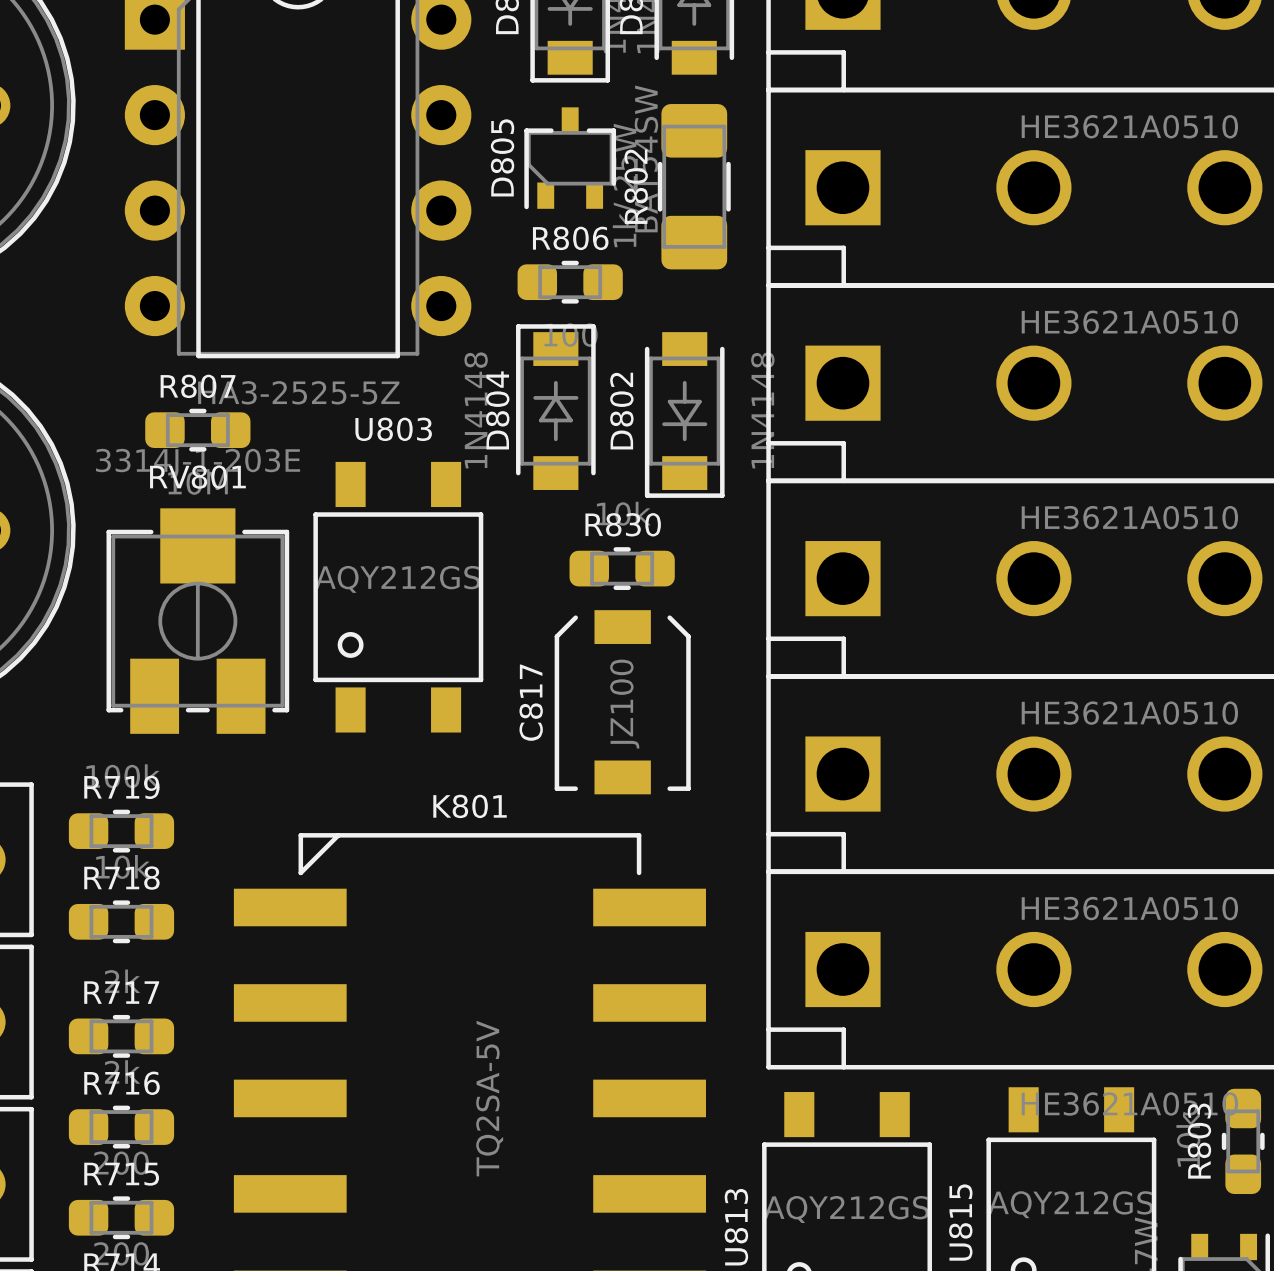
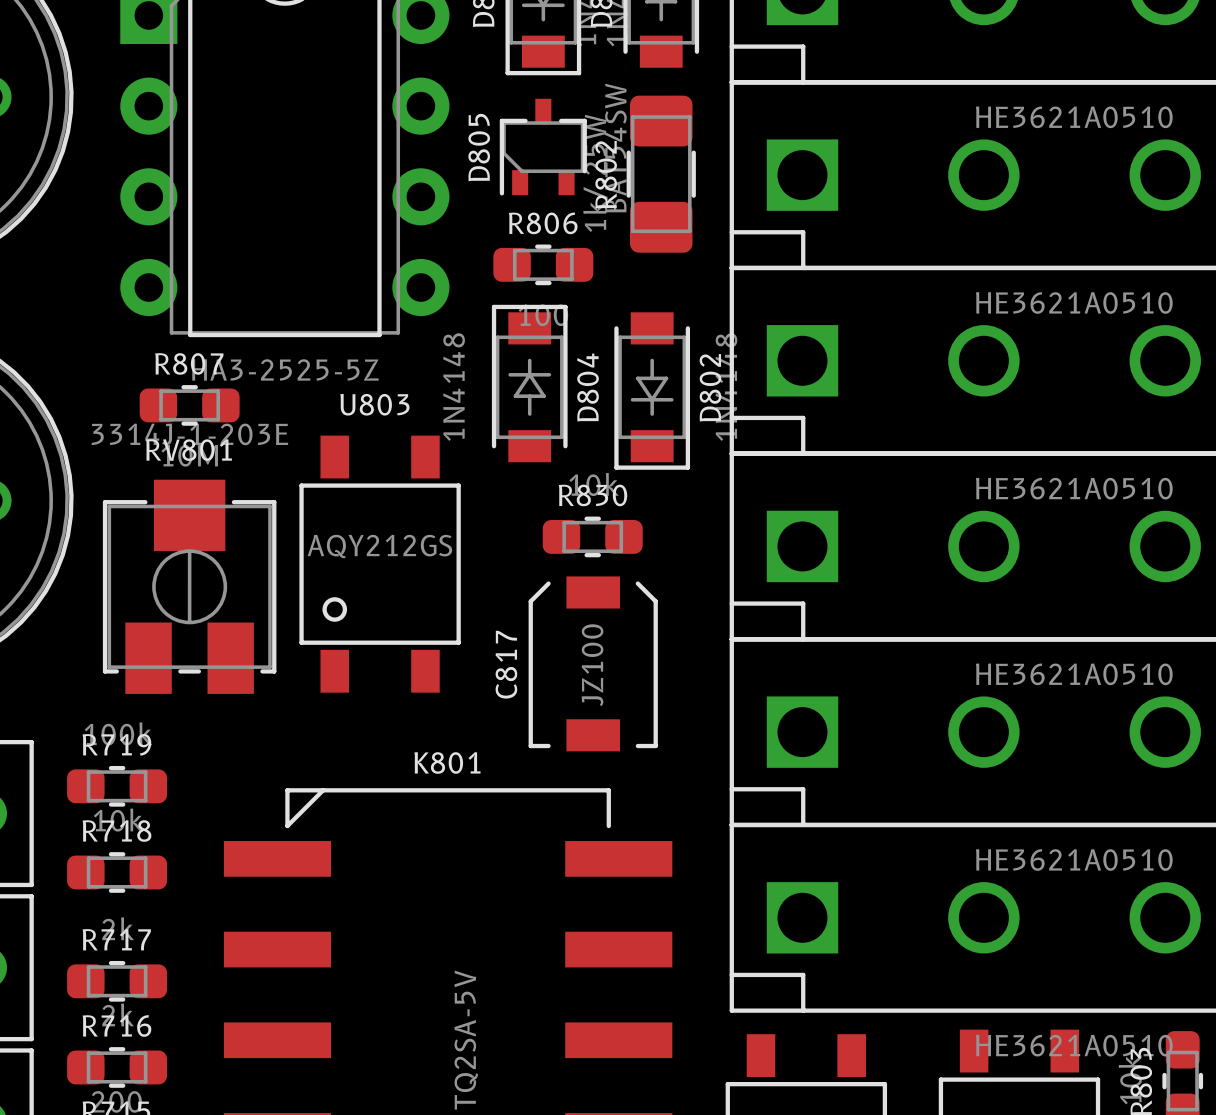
D804 name position: D804 (497, 410) -> D804 (588, 387)
D802 name position: D802 (621, 411) -> D802 (710, 387)

